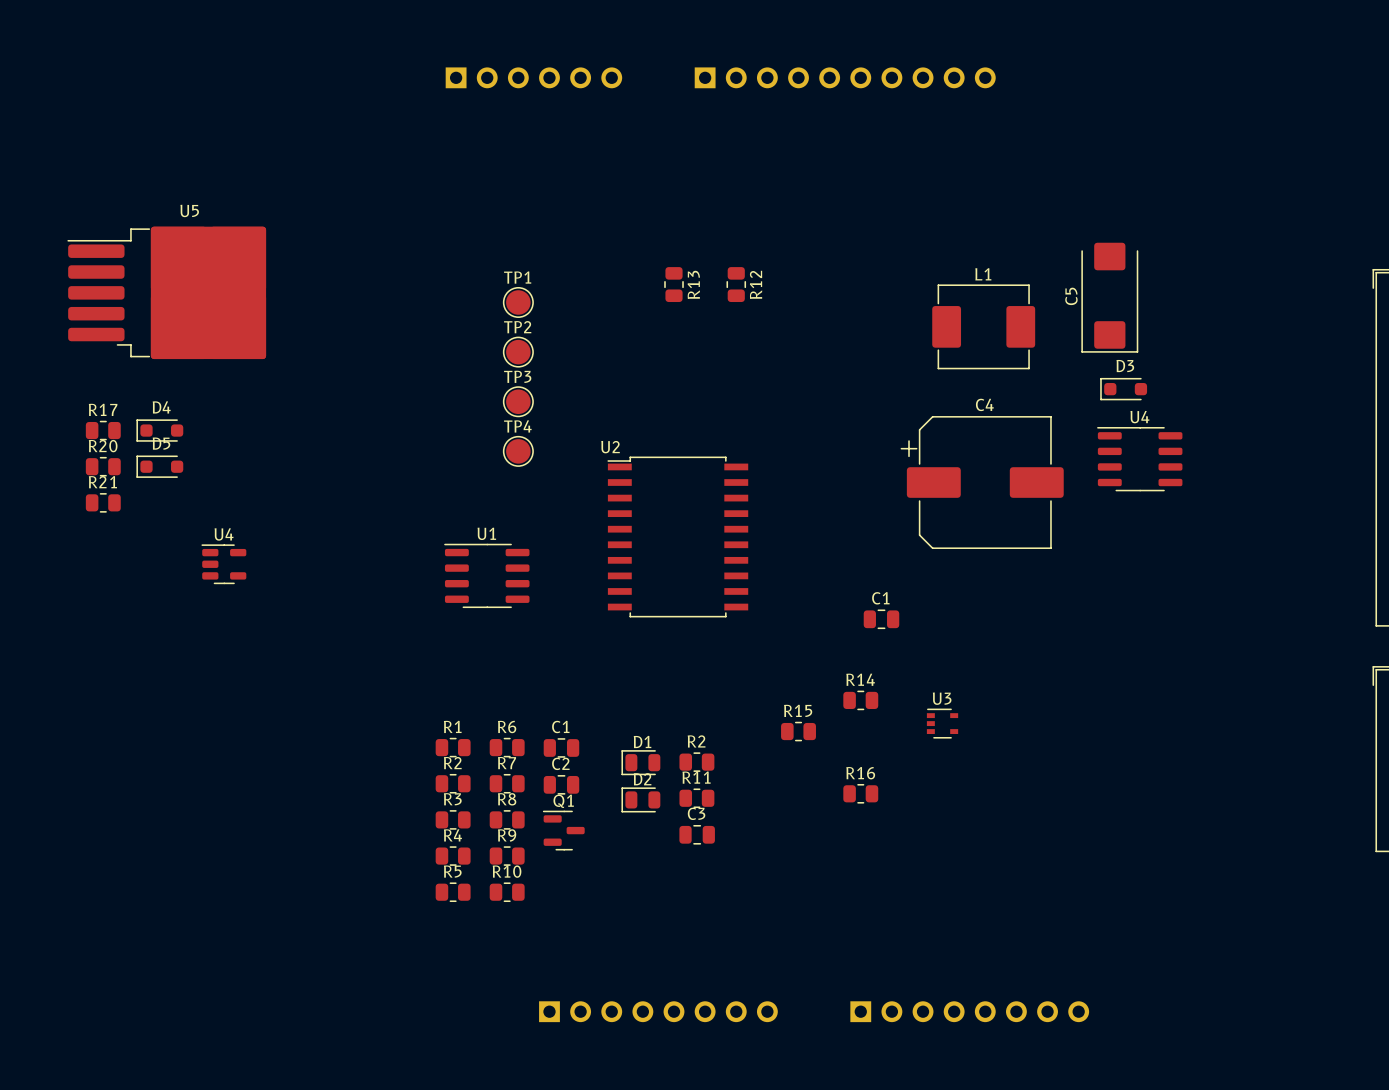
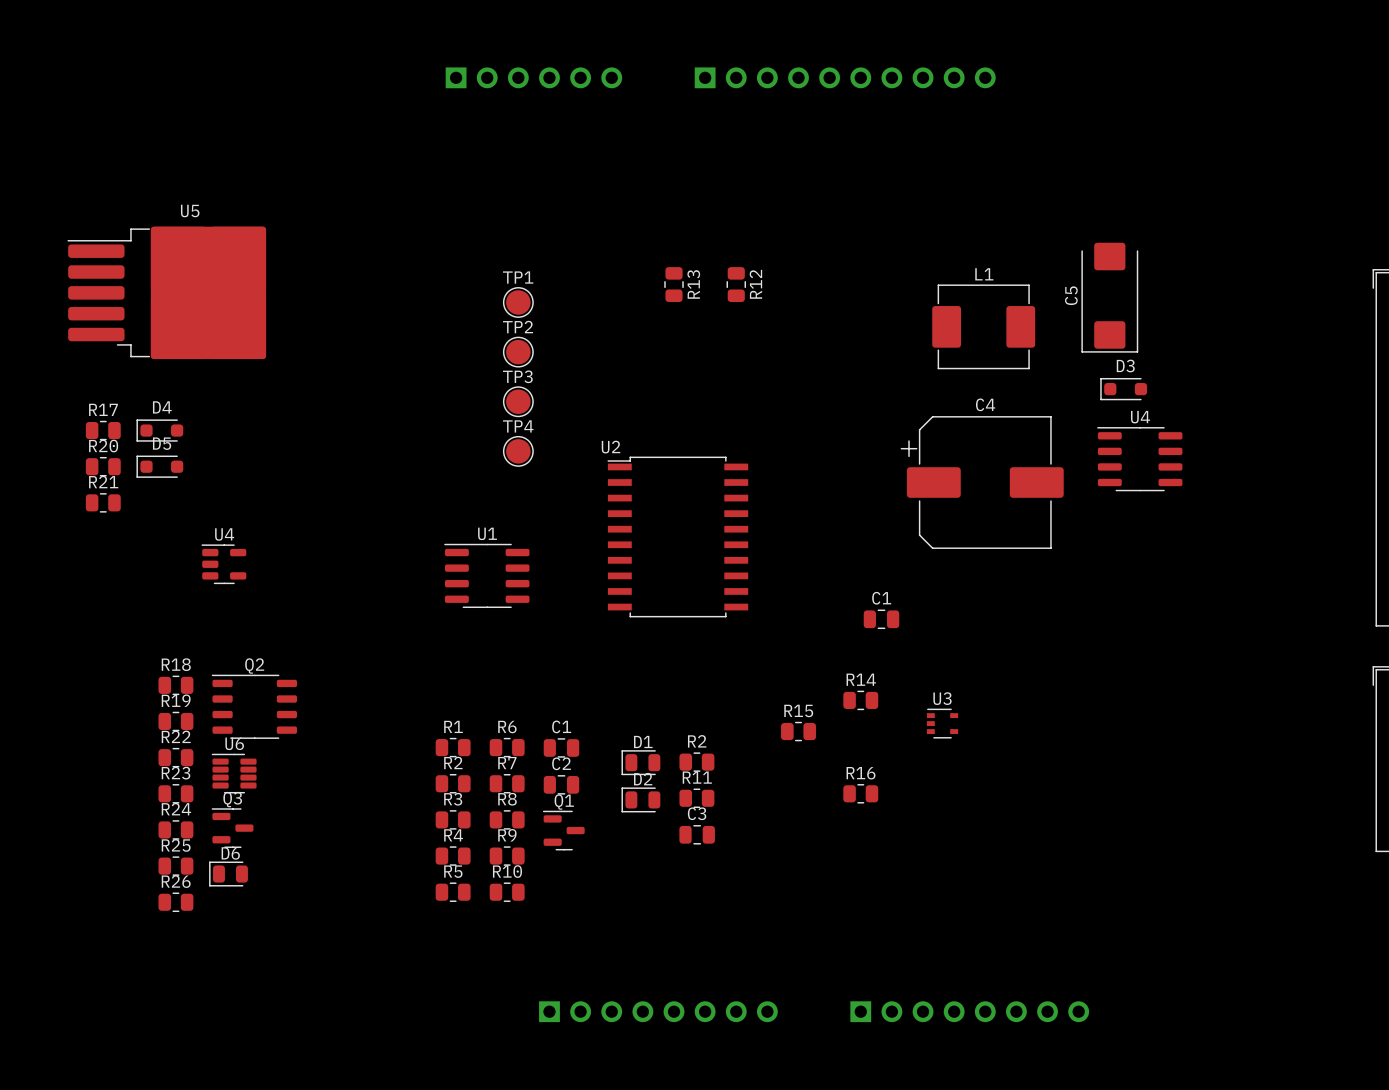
R18: none -> (175, 685)
Q2: none -> (254, 706)
R19: none -> (175, 721)
R22: none -> (175, 757)
U6: none -> (234, 773)
R23: none -> (175, 793)
Q3: none -> (232, 828)
R24: none -> (175, 829)
R25: none -> (175, 866)
D6: none -> (228, 874)
R26: none -> (175, 902)

